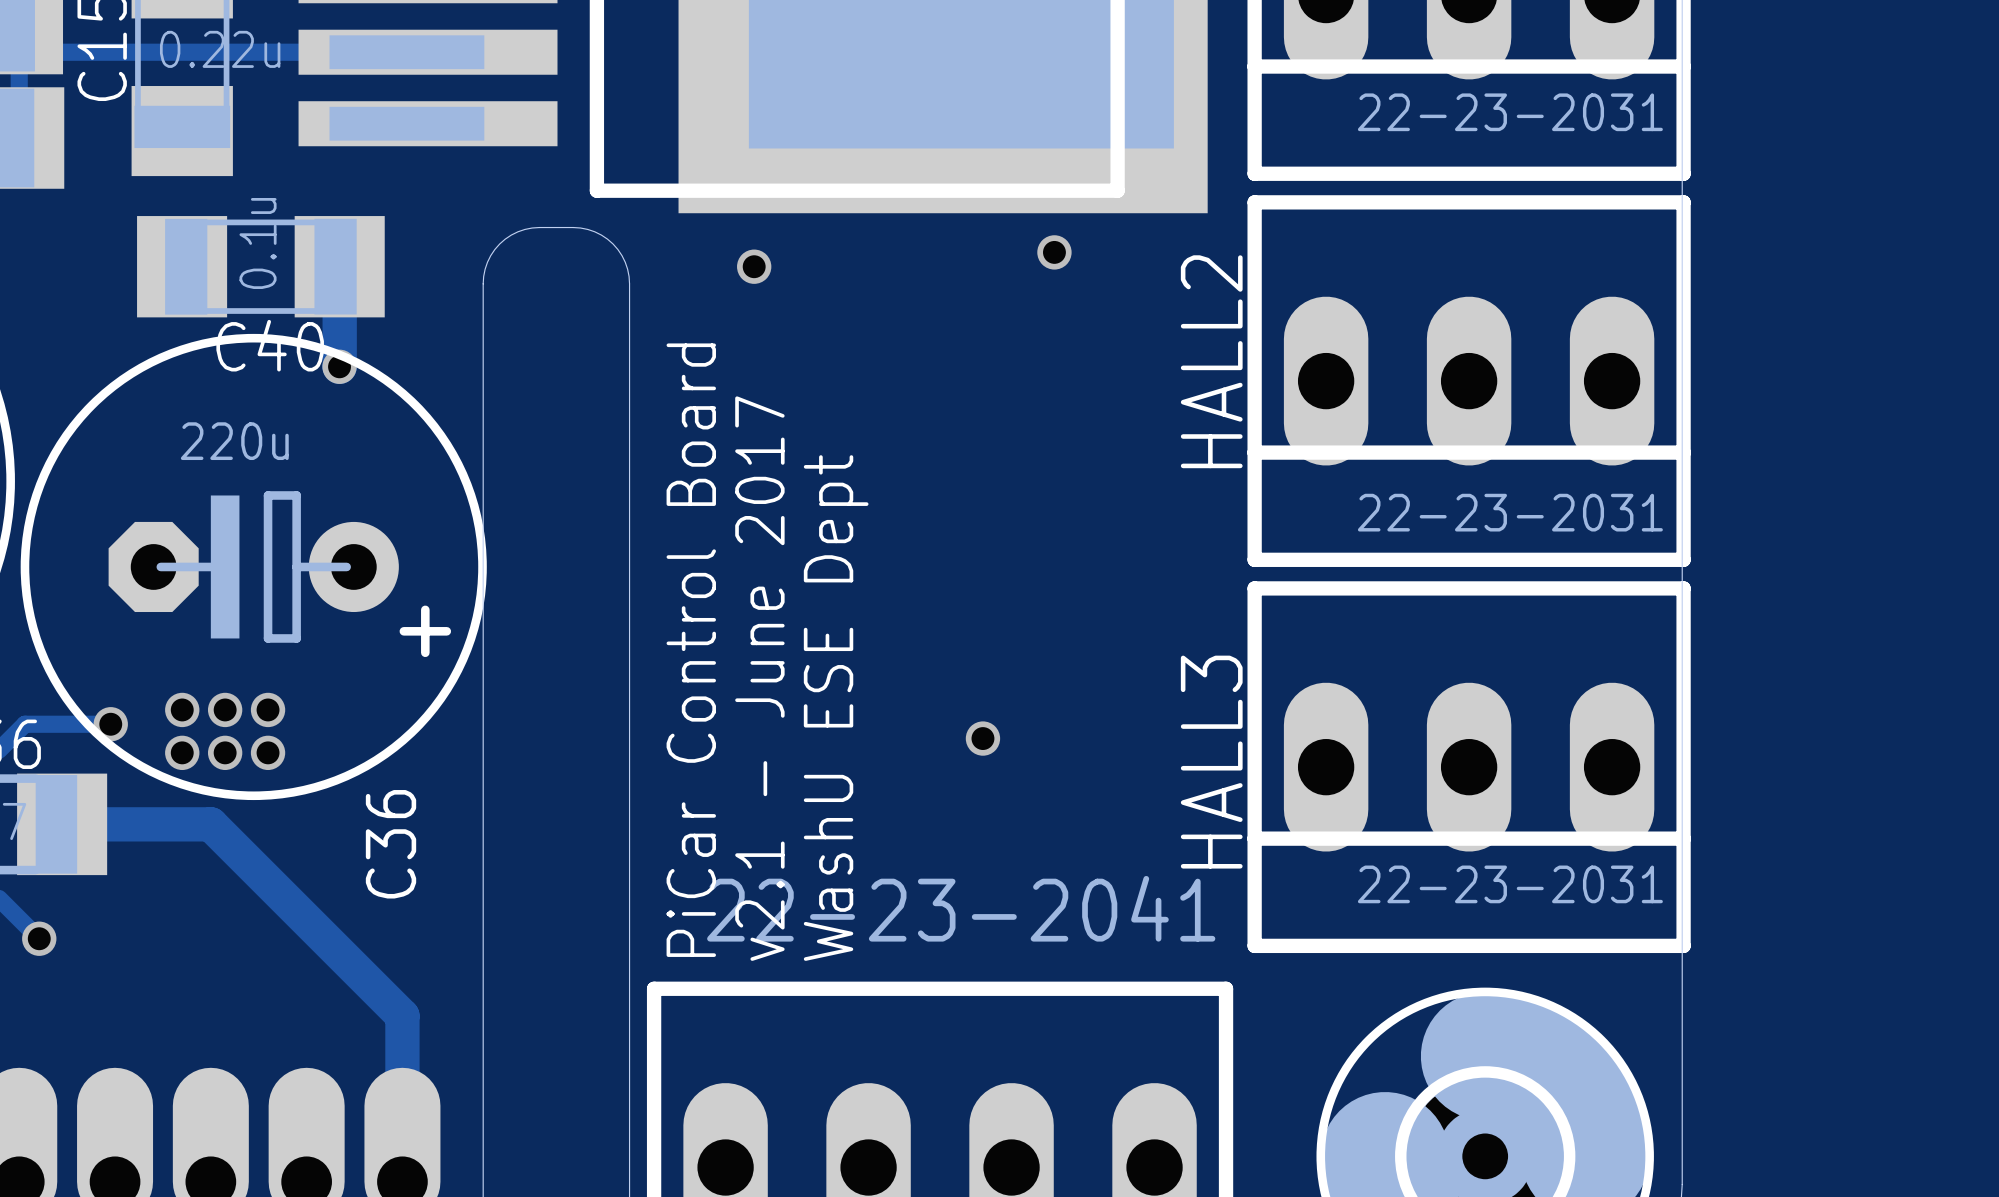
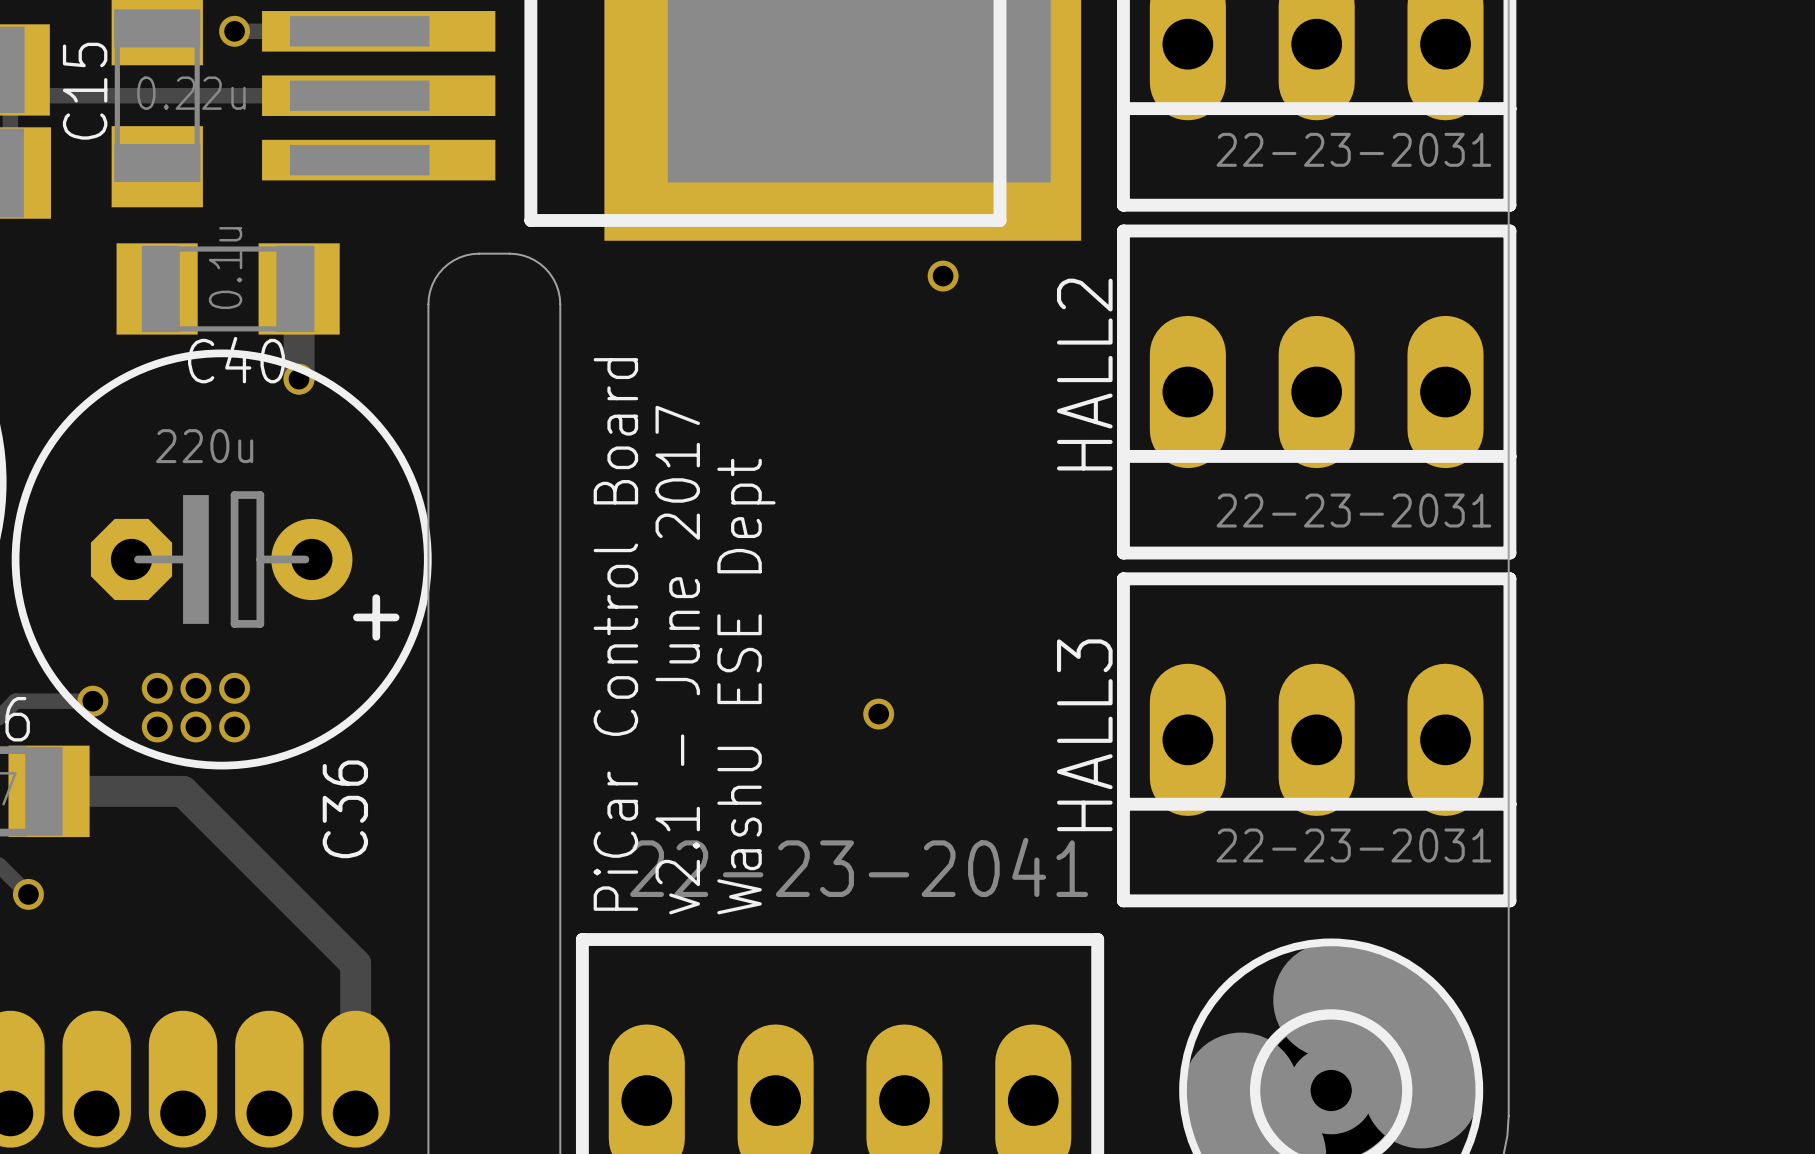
via: (754, 266) -> none

